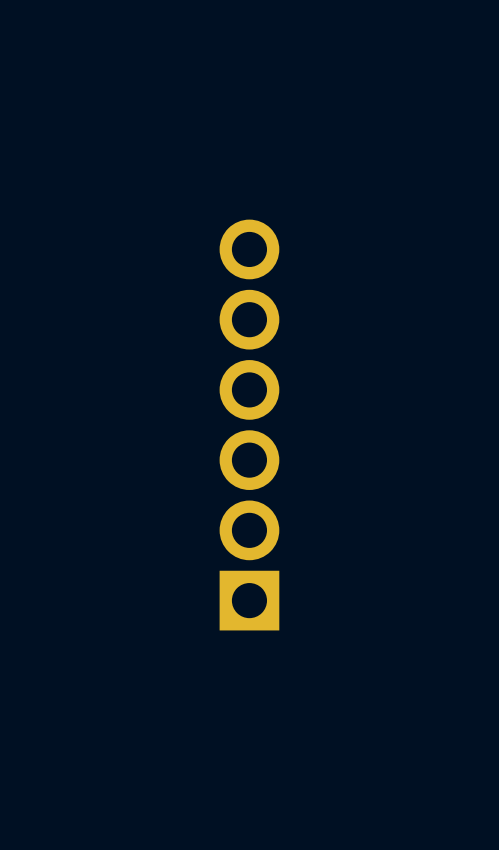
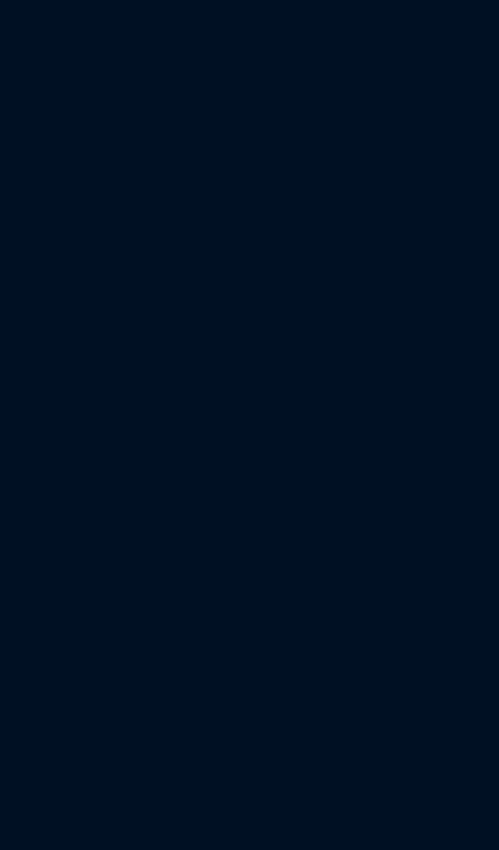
part: (249, 425) -> none

